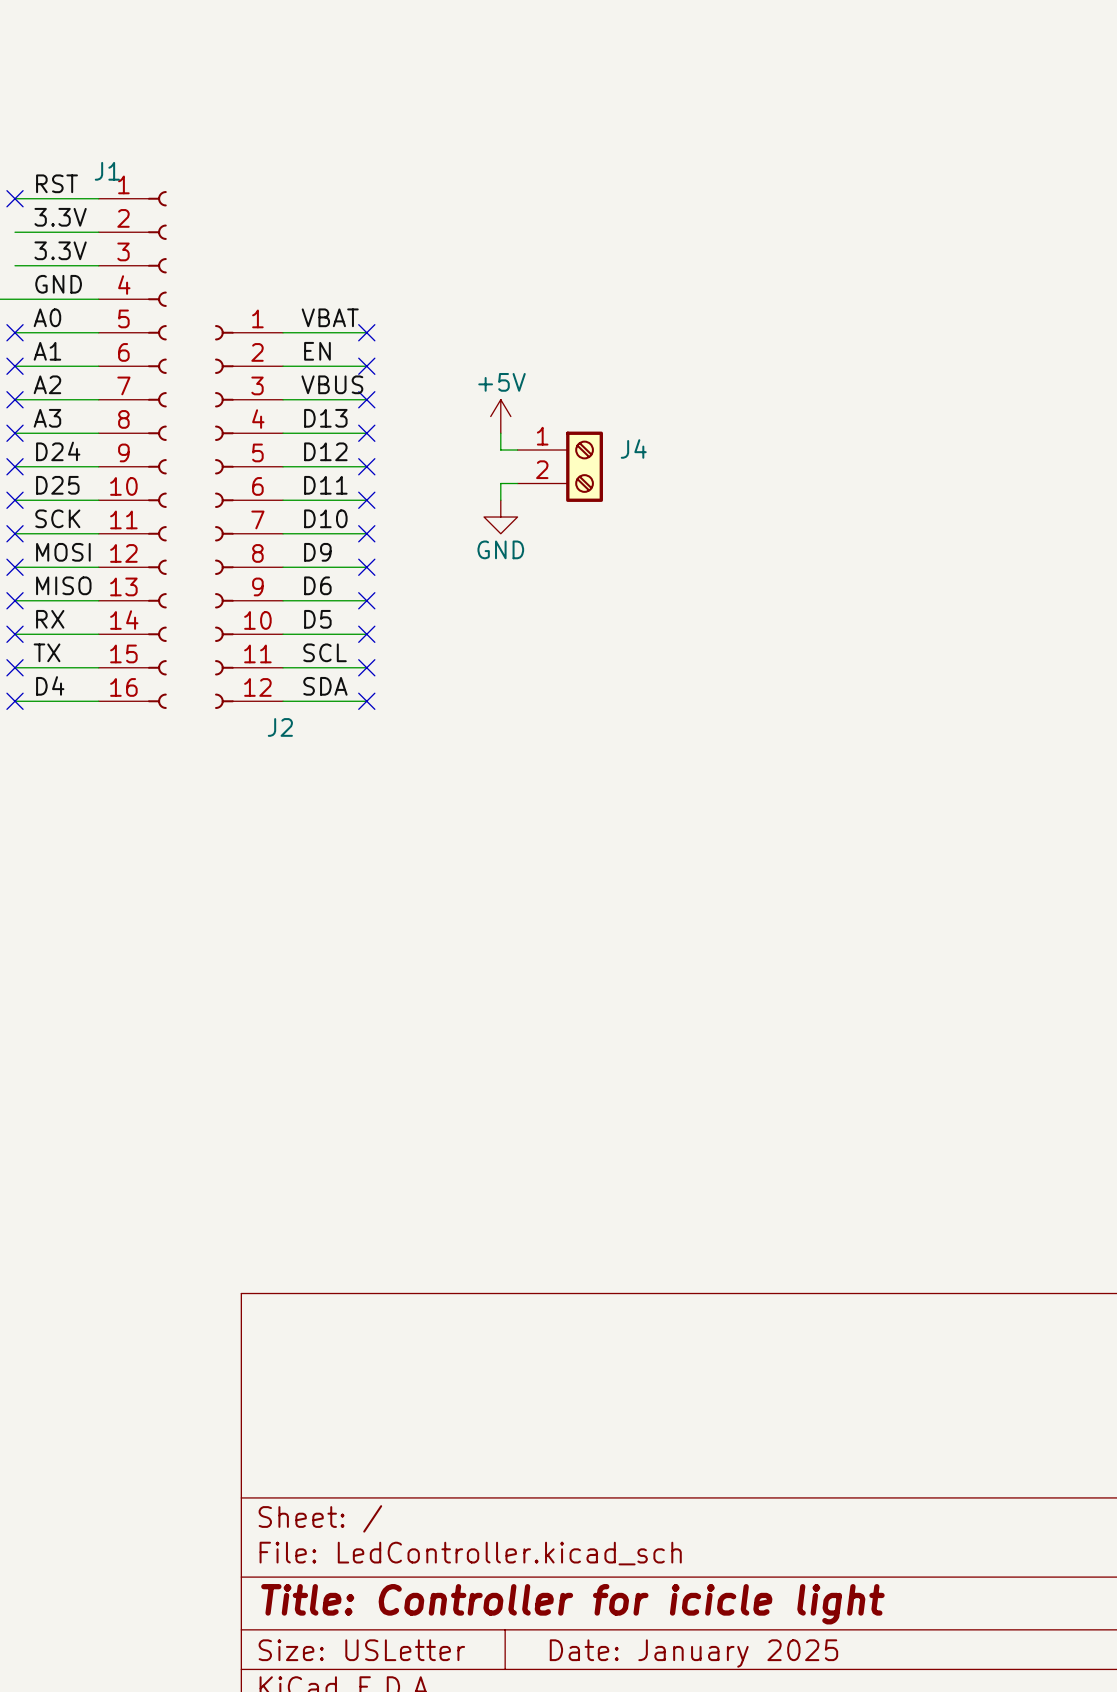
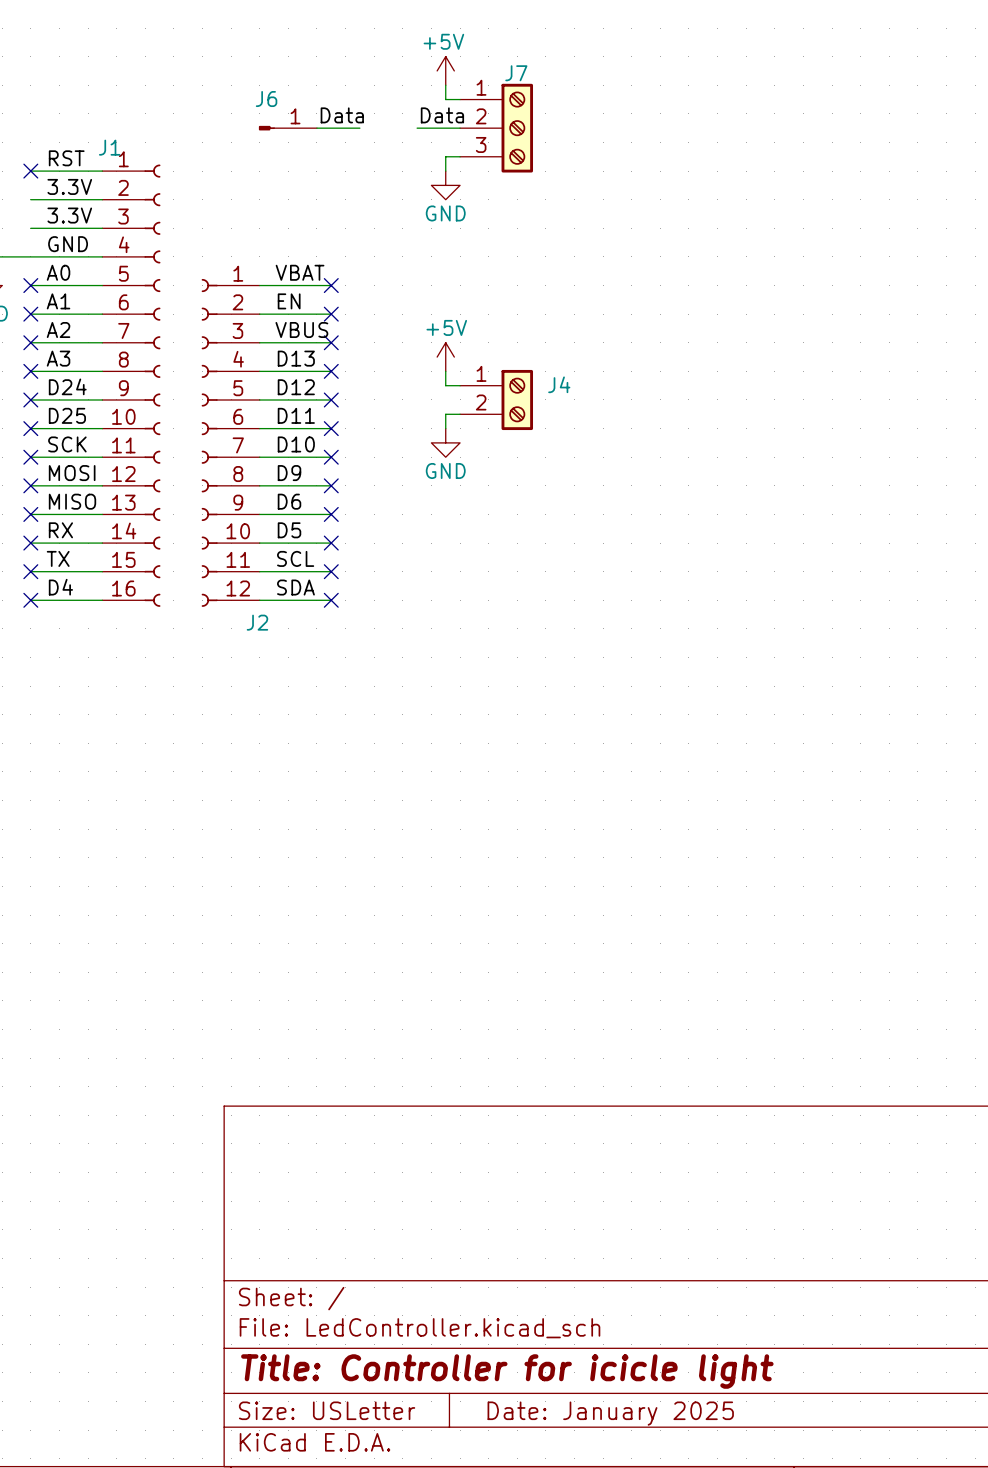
power symbol: none -> +5V (445, 70)
wire: none -> (445, 85) (445, 99) (460, 99)
label: none -> Data (342, 115)
label: none -> Data (442, 115)
J6: none -> (287, 128)
wire: none -> (316, 128) (359, 128)
wire: none -> (417, 128) (460, 128)
J7: none -> (496, 128)
wire: none -> (460, 156) (445, 156) (445, 171)
power symbol: none -> GND (445, 185)

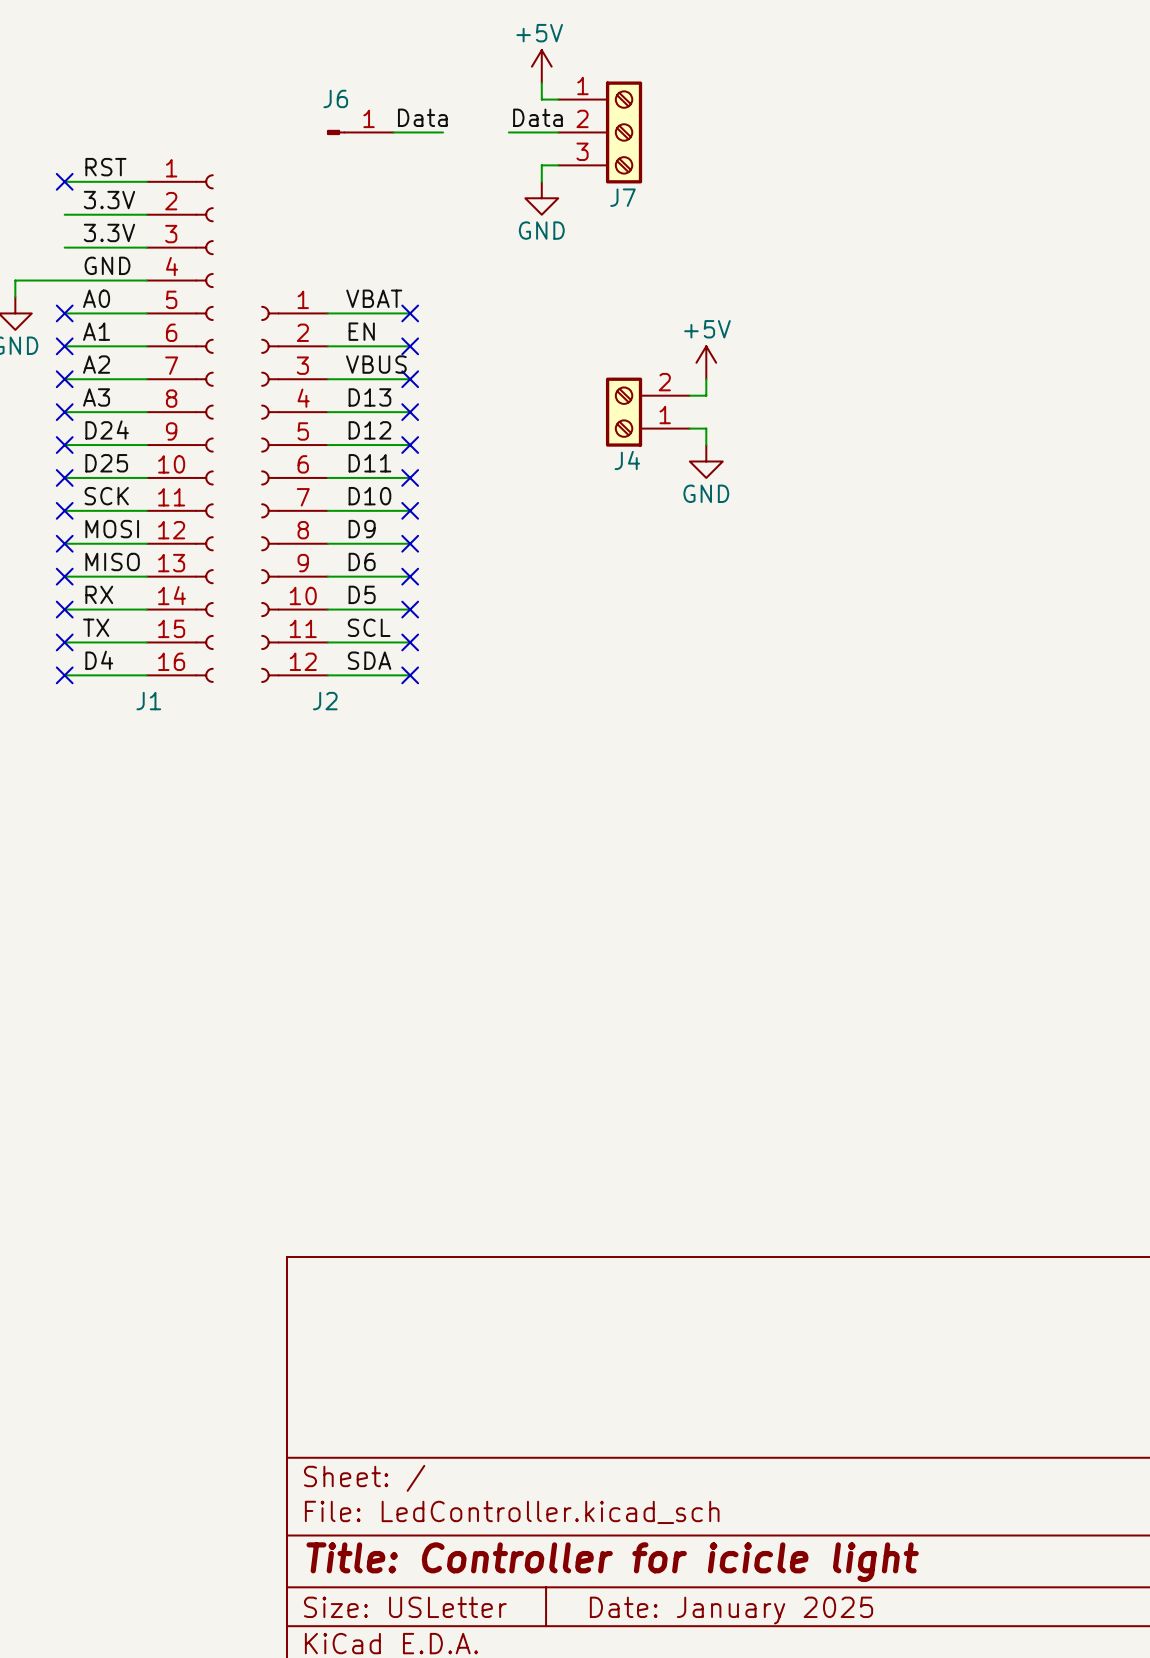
J7 name position: J7 (516, 73) -> J7 (622, 197)
J1 name position: J1 (109, 147) -> J1 (148, 701)
wire: none -> (706, 379) (706, 395) (689, 395)
power symbol position: +5V (445, 357) -> +5V (706, 362)
wire: (445, 371) (445, 385) (460, 385) -> none
J4 name position: J4 (559, 384) -> J4 (627, 460)
wire: none -> (689, 428) (706, 428) (706, 445)
J4 position: (496, 399) -> (647, 412)
J4 rotation: 0° (517, 399) -> 180° (624, 412)
wire: (460, 414) (445, 414) (445, 428) -> none
power symbol position: GND (445, 442) -> GND (706, 461)

